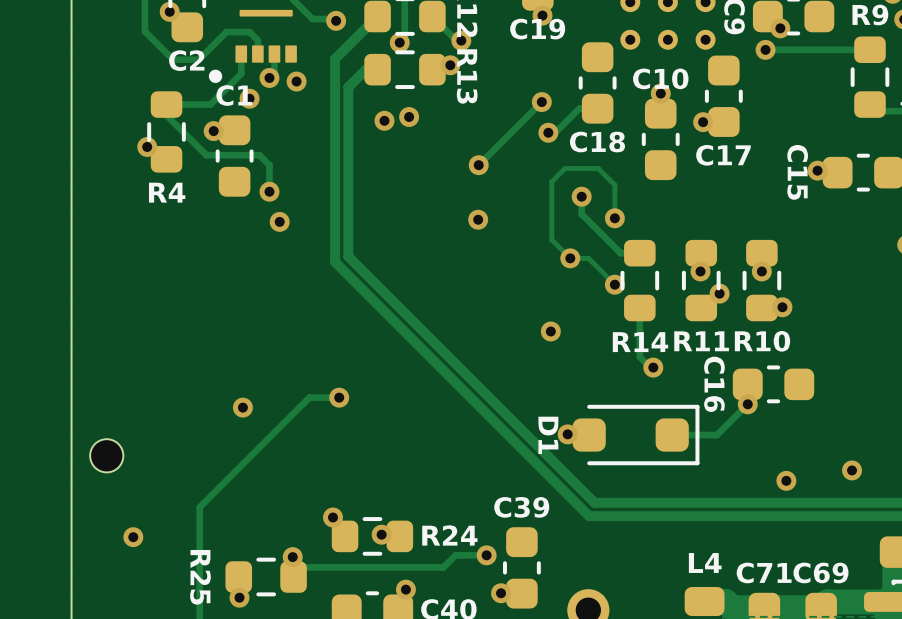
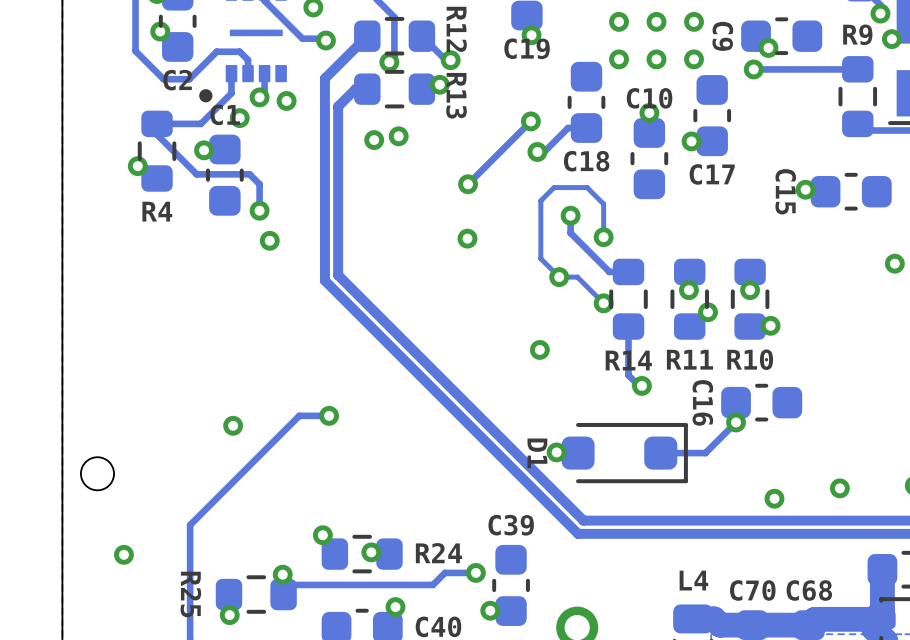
C71 name: C71 (764, 572) -> C70 (752, 590)
C69 name: C69 (820, 572) -> C68 (809, 590)

